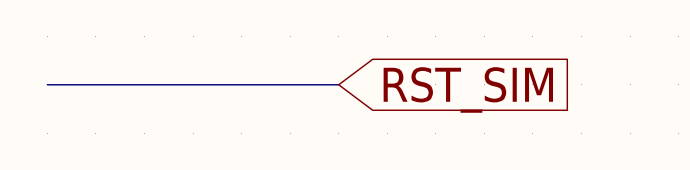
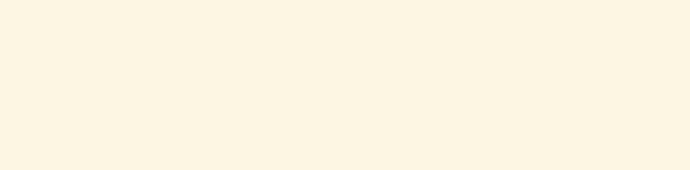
wire: (47, 84) (338, 84) -> none
global label: RST_SIM (468, 89) -> none

